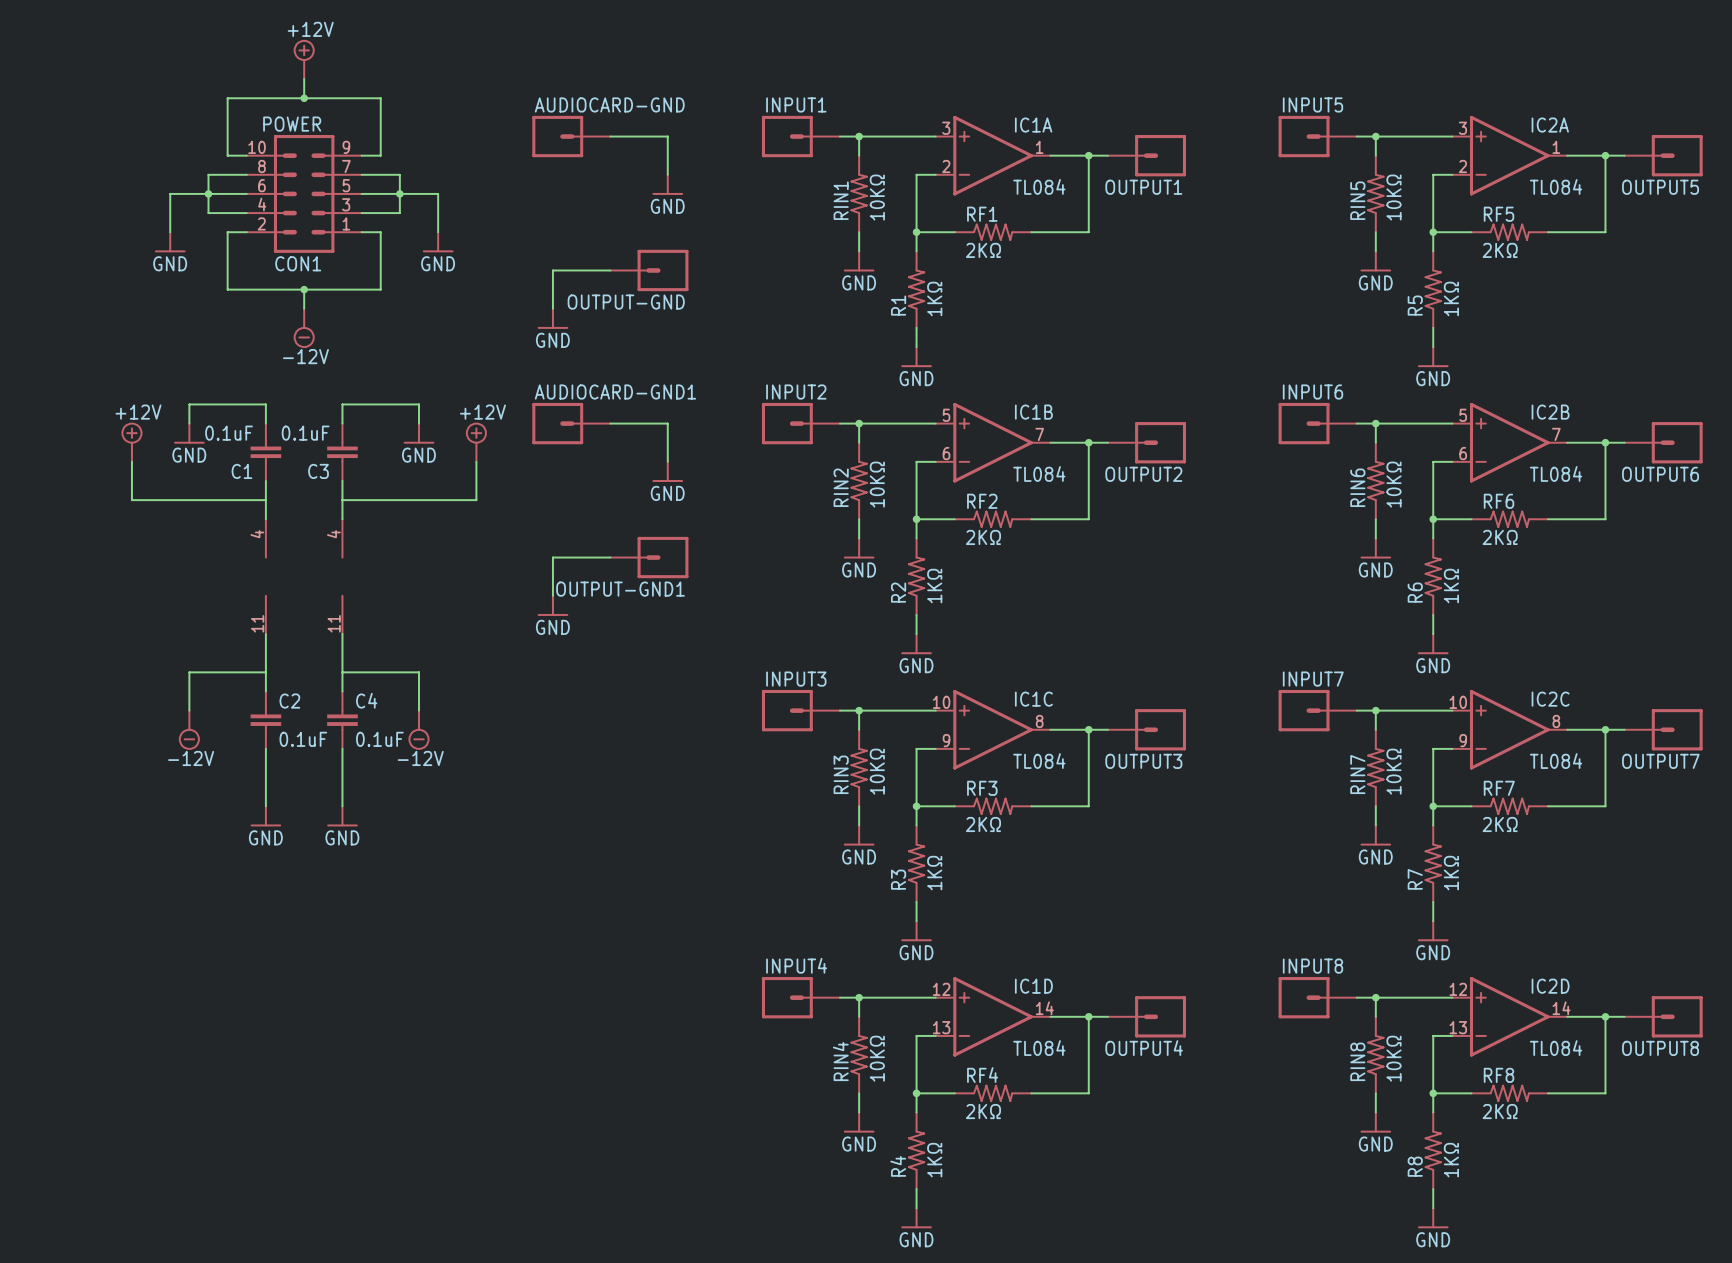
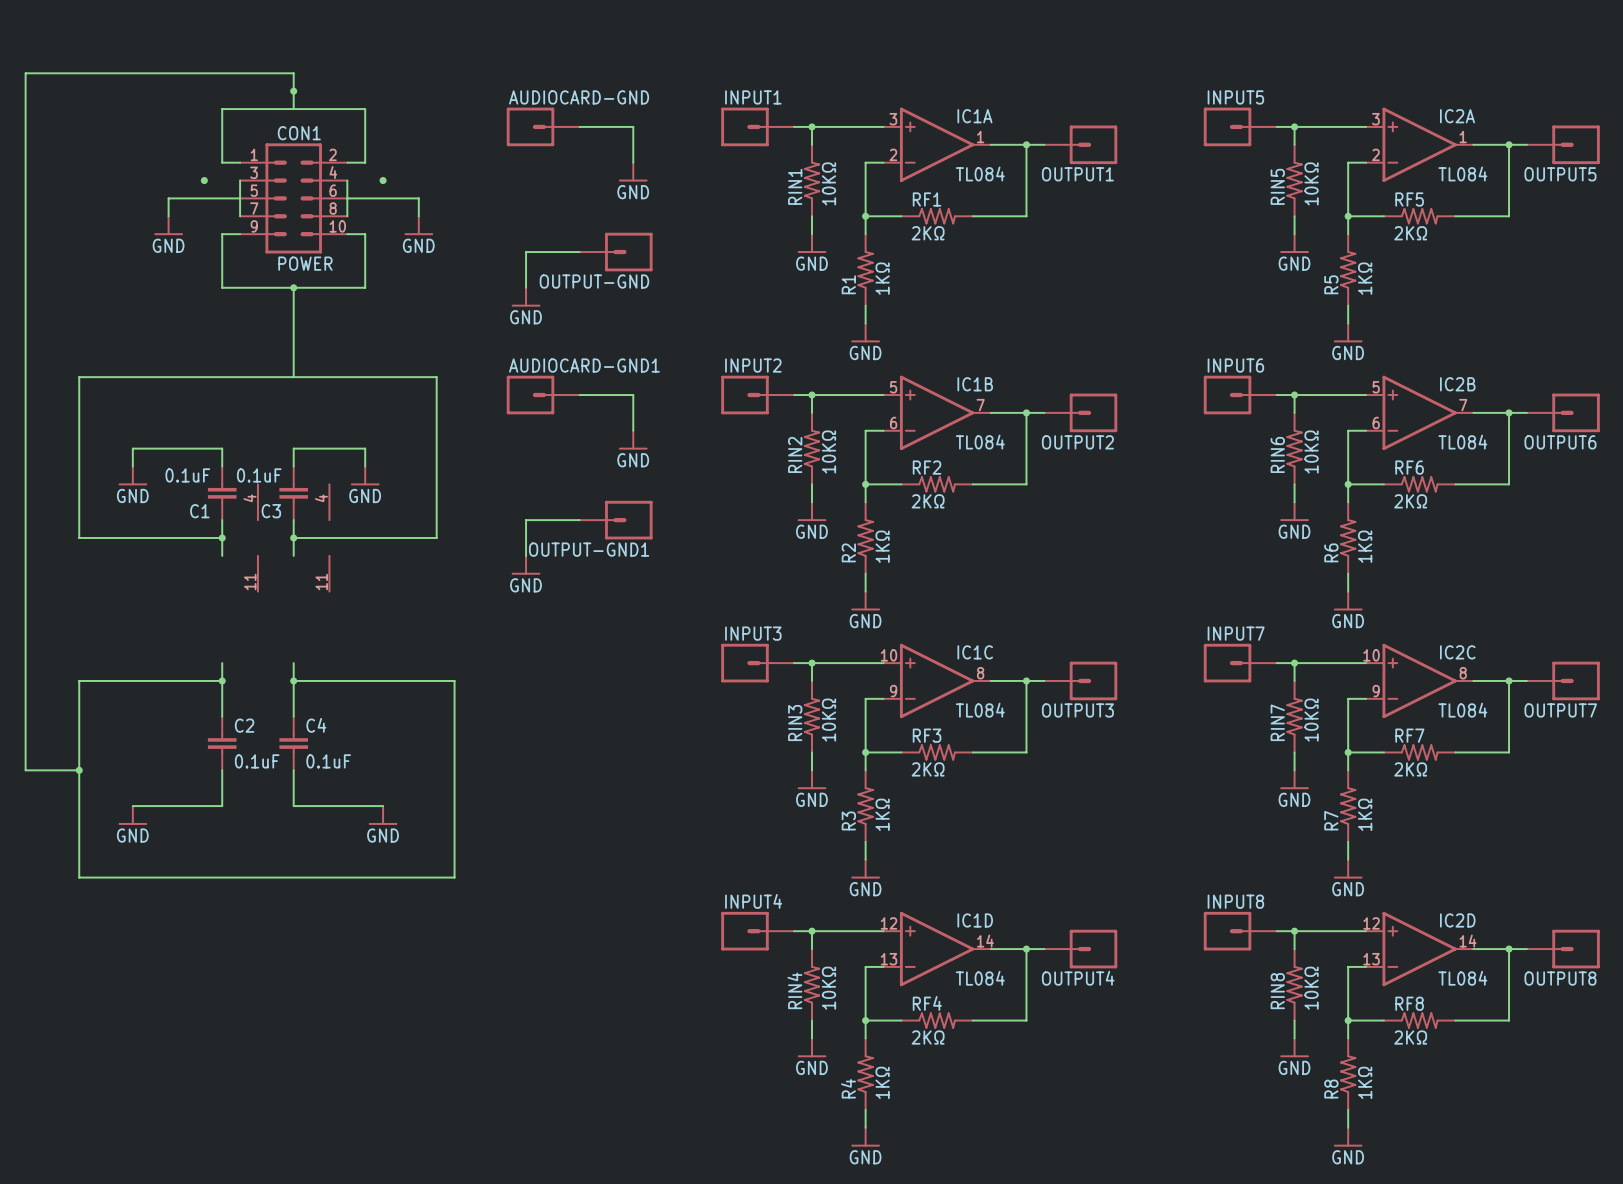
power symbol: +12V (304, 59) -> none
wire: none -> (293, 73) (25, 73) (25, 770) (79, 770)
wire: none -> (293, 91) (293, 109)
wire: (227, 117) (227, 98) (380, 98) (380, 117) -> (222, 109) (365, 109)
wire: (227, 155) (246, 155) -> (222, 144) (222, 162)
wire: (361, 155) (380, 155) -> (365, 162) (365, 144)
wire: (227, 174) (208, 174) (208, 213) -> none
wire: (380, 174) (399, 174) (399, 213) -> none
wire: (246, 193) (170, 193) (170, 213) -> (204, 198) (168, 198)
wire: none -> (240, 180) (240, 216)
CON1 rotation: 0° (304, 193) -> 180° (293, 198)
wire: (361, 193) (438, 193) (438, 213) -> (383, 198) (418, 198)
wire: none -> (347, 180) (347, 216)
wire: (246, 232) (227, 232) (227, 251) -> (240, 234) (222, 234)
wire: (361, 232) (380, 232) (380, 251) -> (347, 234) (365, 234)
wire: (227, 289) (380, 289) -> (222, 269) (222, 287) (365, 287) (365, 269)
wire: (304, 289) (304, 308) -> (293, 377) (293, 287)
junction position: (304, 289) -> (293, 287)
power symbol: -12V (304, 328) -> none
wire: (189, 404) (189, 423) -> (186, 377) (79, 377) (79, 537) (222, 537)
wire: (265, 404) (265, 423) -> (257, 377) (329, 377)
wire: (342, 404) (342, 423) -> none
wire: (419, 404) (419, 423) -> (400, 377) (436, 377) (436, 537) (293, 537)
power symbol position: GND (189, 433) -> GND (132, 475)
power symbol position: GND (419, 433) -> GND (365, 475)
power symbol: +12V (131, 442) -> none
power symbol: +12V (476, 442) -> none
C1 position: (265, 452) -> (222, 493)
C3 position: (342, 452) -> (293, 493)
wire: (131, 461) (131, 480) -> (222, 466) (222, 448) (132, 448)
wire: (476, 461) (476, 500) (342, 500) -> none
wire: (265, 480) (265, 519) -> (222, 520) (222, 555)
wire: (342, 480) (342, 519) -> (293, 520) (293, 555)
wire: (131, 500) (265, 500) -> none
wire: none -> (293, 466) (293, 448) (365, 448) (365, 466)
junction: none -> (222, 537)
junction: none -> (293, 537)
wire: (265, 634) (265, 691) -> (222, 663) (222, 716)
wire: (342, 634) (342, 691) -> (293, 663) (293, 716)
wire: (265, 672) (189, 672) (189, 710) -> none
wire: (342, 672) (419, 672) (419, 710) -> none
C2 position: (265, 720) -> (222, 743)
C4 position: (342, 720) -> (293, 743)
wire: none -> (222, 680) (79, 680) (79, 877) (454, 877) (454, 680) (293, 680)
junction: none -> (222, 680)
junction: none -> (293, 680)
power symbol: -12V (189, 730) -> none
power symbol: -12V (419, 730) -> none
wire: (265, 748) (265, 806) -> none
wire: (342, 748) (342, 806) -> none
power symbol: GND (265, 816) -> none
power symbol: GND (342, 816) -> none
junction: none -> (79, 770)
wire: none -> (222, 770) (222, 806) (132, 806)
wire: none -> (293, 770) (293, 806) (383, 806)
power symbol: none -> GND (132, 815)
power symbol: none -> GND (383, 815)

